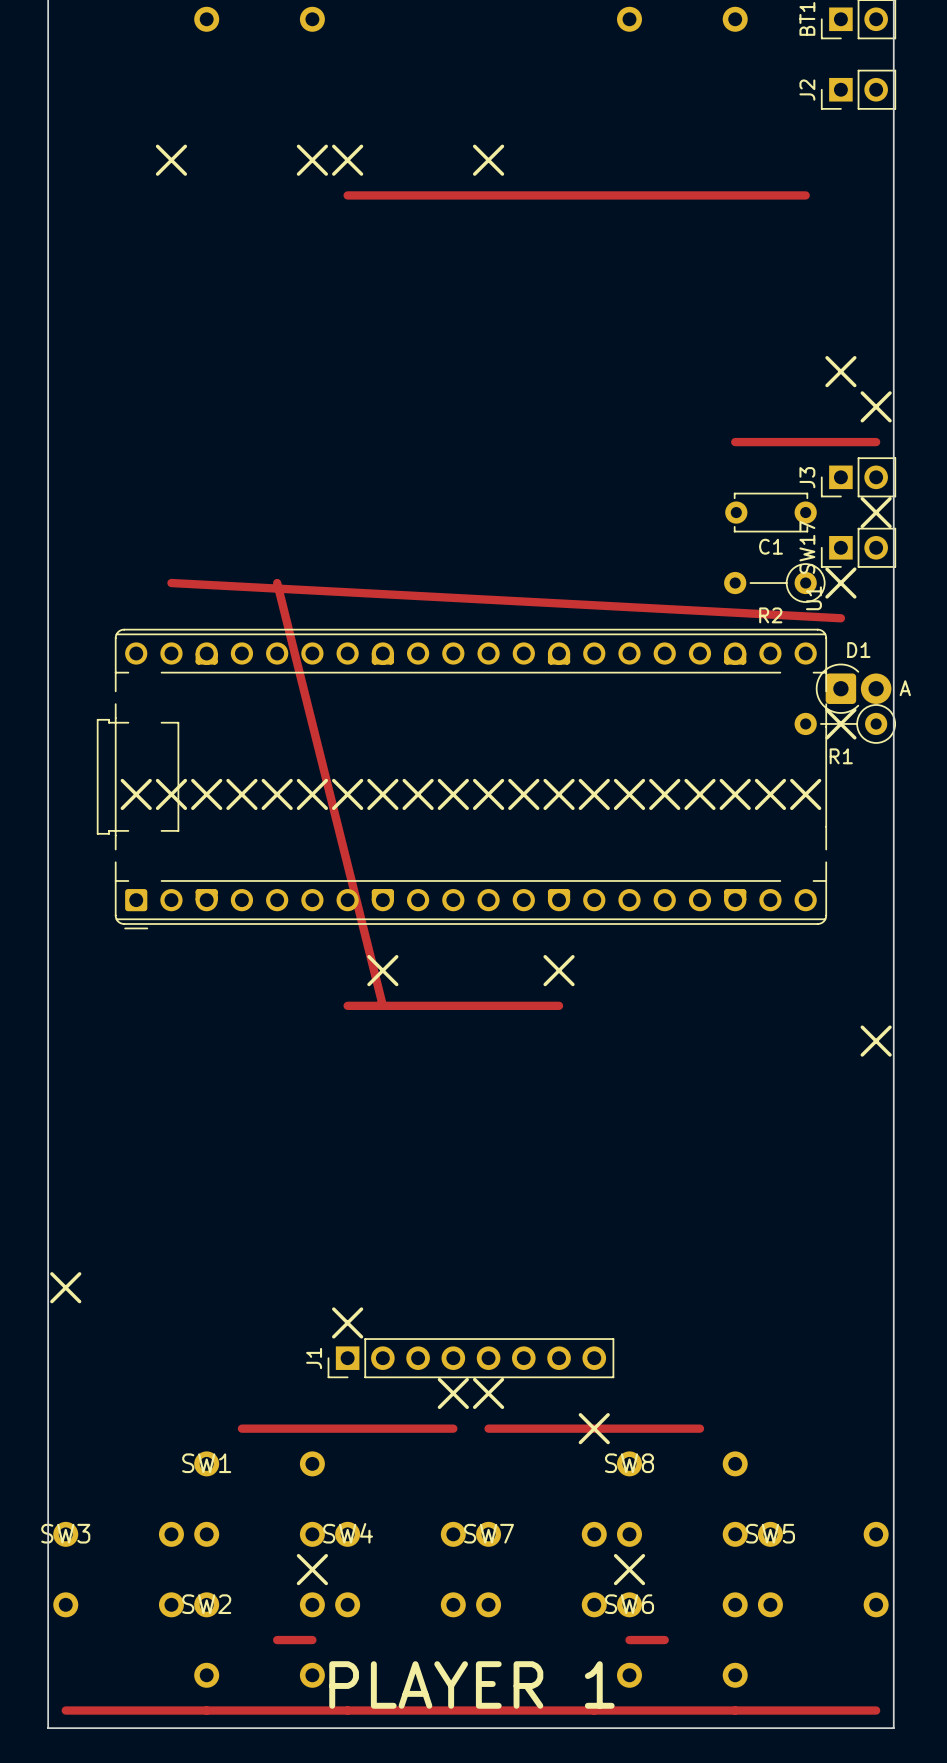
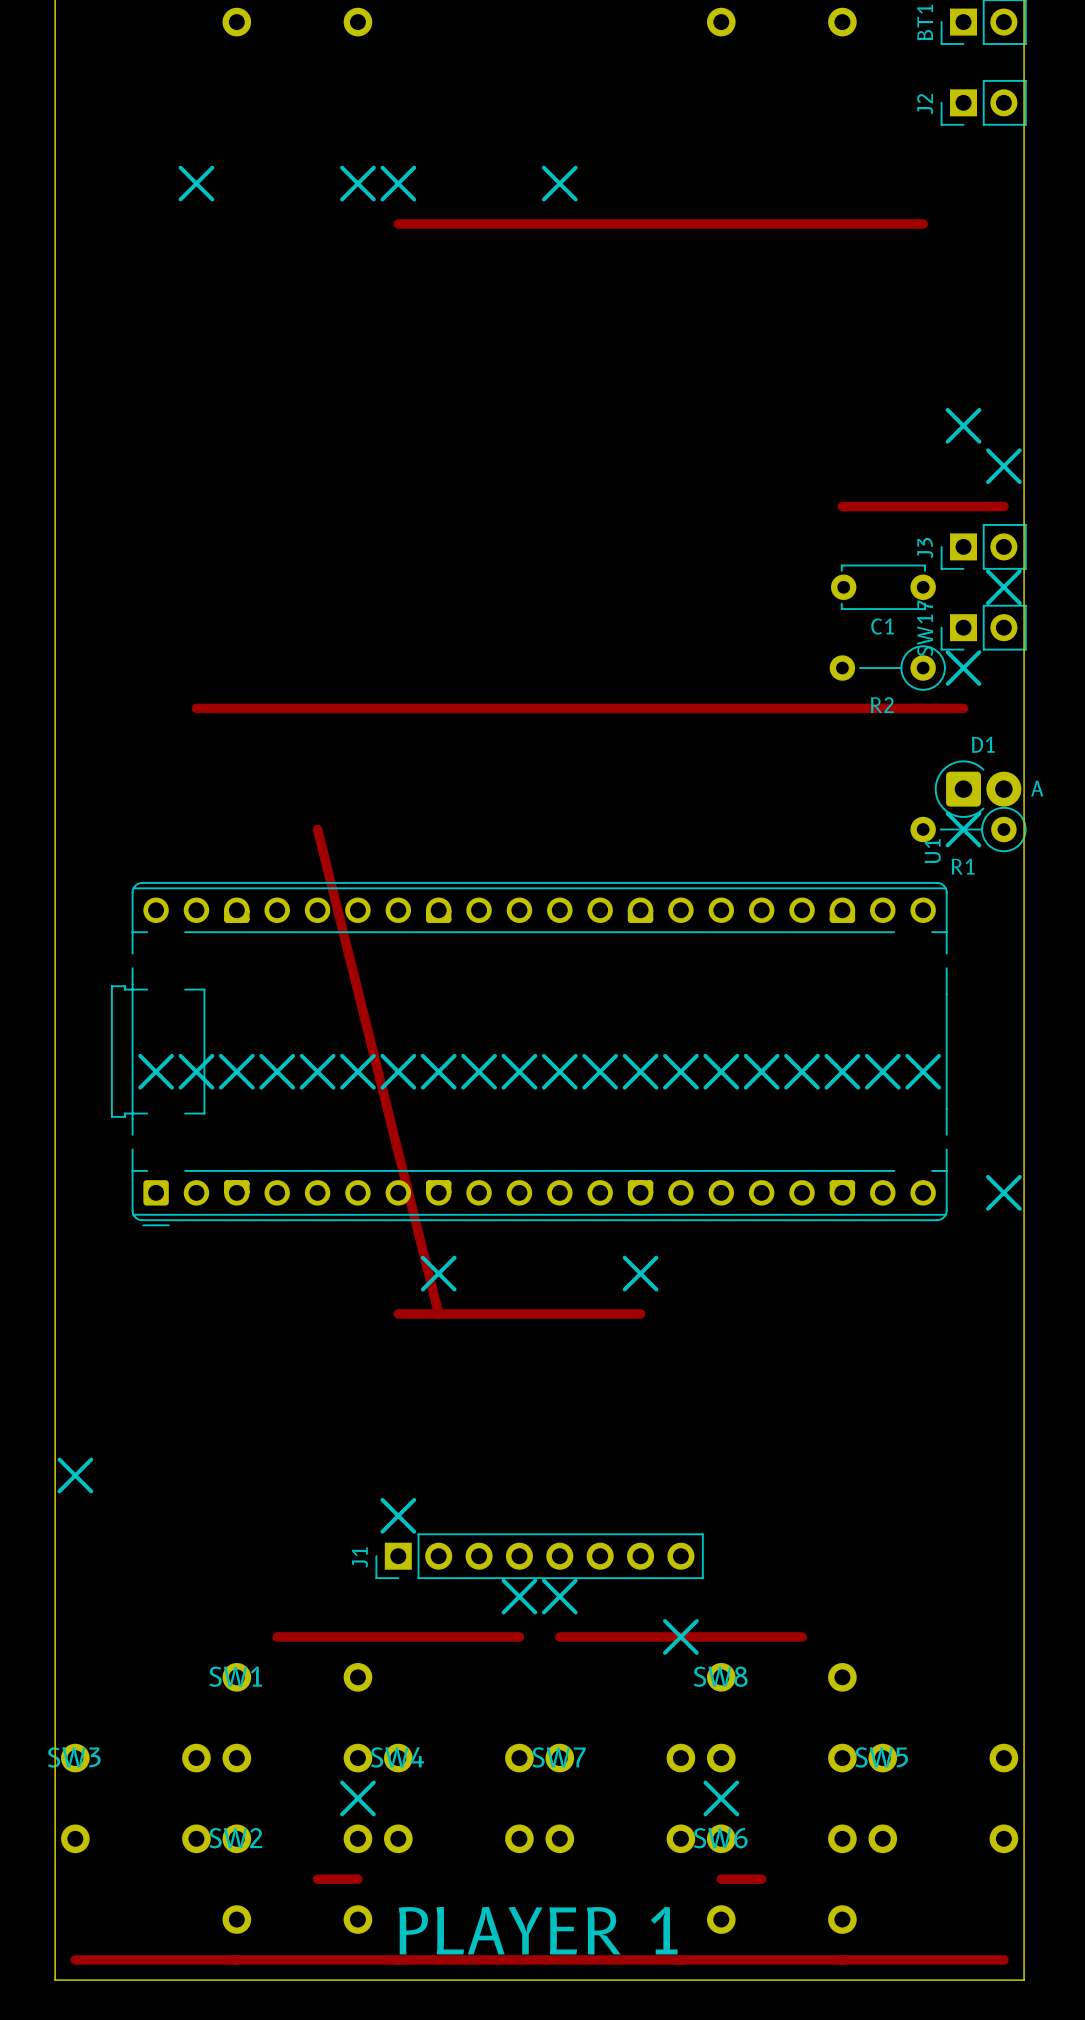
track: (171, 583) (840, 618) -> (196, 708) (963, 708)
track: (277, 583) (382, 1005) -> (317, 829) (438, 1313)
U1 position: (461, 779) -> (529, 1054)
line: (122, 780) (150, 808) -> (140, 1055) (171, 1087)
line: (150, 780) (122, 808) -> (171, 1055) (140, 1087)
line: (157, 780) (185, 808) -> (180, 1055) (212, 1087)
line: (185, 780) (157, 808) -> (212, 1055) (180, 1087)
line: (192, 780) (220, 808) -> (220, 1055) (252, 1087)
line: (220, 780) (192, 808) -> (252, 1055) (220, 1087)
line: (228, 780) (255, 808) -> (261, 1055) (293, 1087)
line: (255, 780) (228, 808) -> (293, 1055) (261, 1087)
line: (263, 780) (291, 808) -> (301, 1055) (333, 1087)
line: (291, 780) (263, 808) -> (333, 1055) (301, 1087)
line: (298, 780) (326, 808) -> (342, 1055) (373, 1087)
line: (326, 780) (298, 808) -> (373, 1055) (342, 1087)
line: (333, 780) (361, 808) -> (382, 1055) (414, 1087)
line: (361, 780) (333, 808) -> (414, 1055) (382, 1087)
line: (368, 780) (396, 808) -> (422, 1055) (454, 1087)
line: (396, 780) (368, 808) -> (454, 1055) (422, 1087)
line: (404, 780) (431, 808) -> (463, 1055) (494, 1087)
line: (431, 780) (404, 808) -> (494, 1055) (463, 1087)
line: (439, 780) (467, 808) -> (503, 1055) (535, 1087)
line: (467, 780) (439, 808) -> (535, 1055) (503, 1087)
line: (474, 780) (502, 808) -> (543, 1055) (575, 1087)
line: (502, 780) (474, 808) -> (575, 1055) (543, 1087)
line: (509, 780) (537, 808) -> (584, 1055) (616, 1087)
line: (537, 780) (509, 808) -> (616, 1055) (584, 1087)
line: (545, 780) (572, 808) -> (624, 1055) (656, 1087)
line: (572, 780) (545, 808) -> (656, 1055) (624, 1087)
line: (580, 780) (608, 808) -> (665, 1055) (696, 1087)
line: (608, 780) (580, 808) -> (696, 1055) (665, 1087)
line: (615, 780) (643, 808) -> (705, 1055) (737, 1087)
line: (643, 780) (615, 808) -> (737, 1055) (705, 1087)
line: (650, 780) (678, 808) -> (745, 1055) (777, 1087)
line: (678, 780) (650, 808) -> (777, 1055) (745, 1087)
line: (686, 780) (713, 808) -> (786, 1055) (817, 1087)
line: (713, 780) (686, 808) -> (817, 1055) (786, 1087)
line: (721, 780) (749, 808) -> (826, 1055) (858, 1087)
line: (749, 780) (721, 808) -> (858, 1055) (826, 1087)
line: (756, 780) (784, 808) -> (866, 1055) (898, 1087)
line: (784, 780) (756, 808) -> (898, 1055) (866, 1087)
line: (791, 780) (819, 808) -> (907, 1055) (939, 1087)
line: (819, 780) (791, 808) -> (939, 1055) (907, 1087)
line: (368, 956) (396, 984) -> (422, 1257) (454, 1289)
line: (396, 956) (368, 984) -> (454, 1257) (422, 1289)
line: (545, 956) (572, 984) -> (624, 1257) (656, 1289)
line: (572, 956) (545, 984) -> (656, 1257) (624, 1289)
track: (347, 1005) (559, 1005) -> (398, 1313) (640, 1313)

